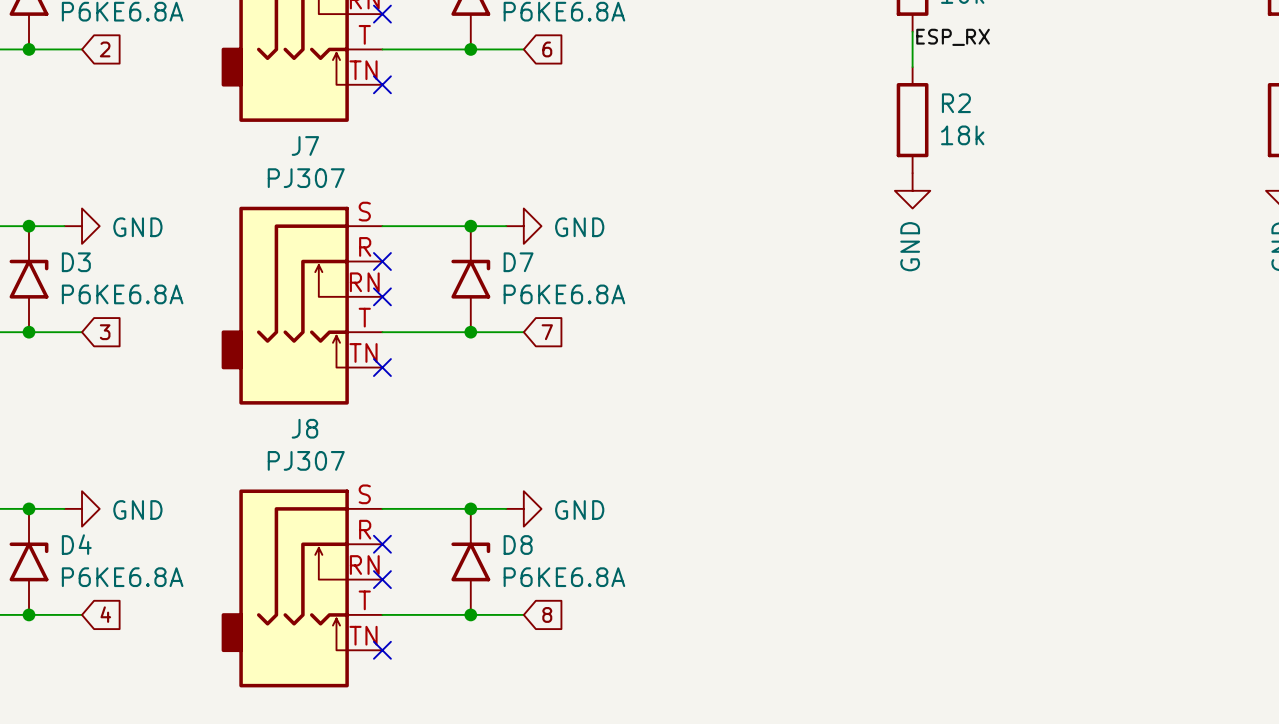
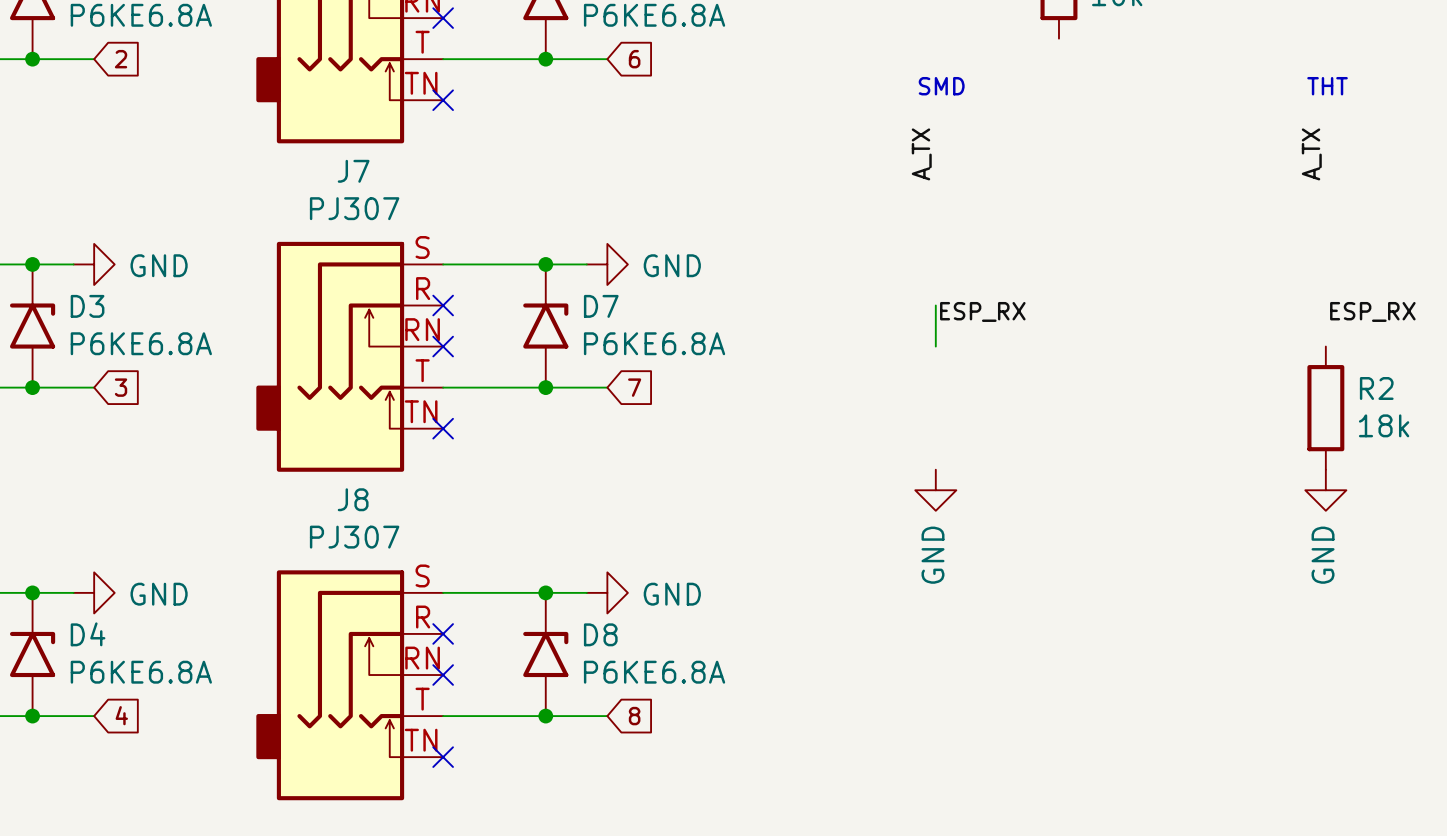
wire: (912, 31) (912, 67) -> (935, 305) (935, 346)
label: ESP_RX (953, 37) -> none
text: none -> SMD (941, 86)
text: none -> THT (1327, 86)
R2 position: (912, 120) -> (1325, 408)
label: none -> A_TX (921, 154)
label: none -> A_TX (1311, 154)
power symbol: GND (912, 190) -> none
label: none -> ESP_RX (982, 311)
label: none -> ESP_RX (1372, 311)
power symbol: none -> GND (935, 490)
power symbol: none -> GND (1325, 490)

